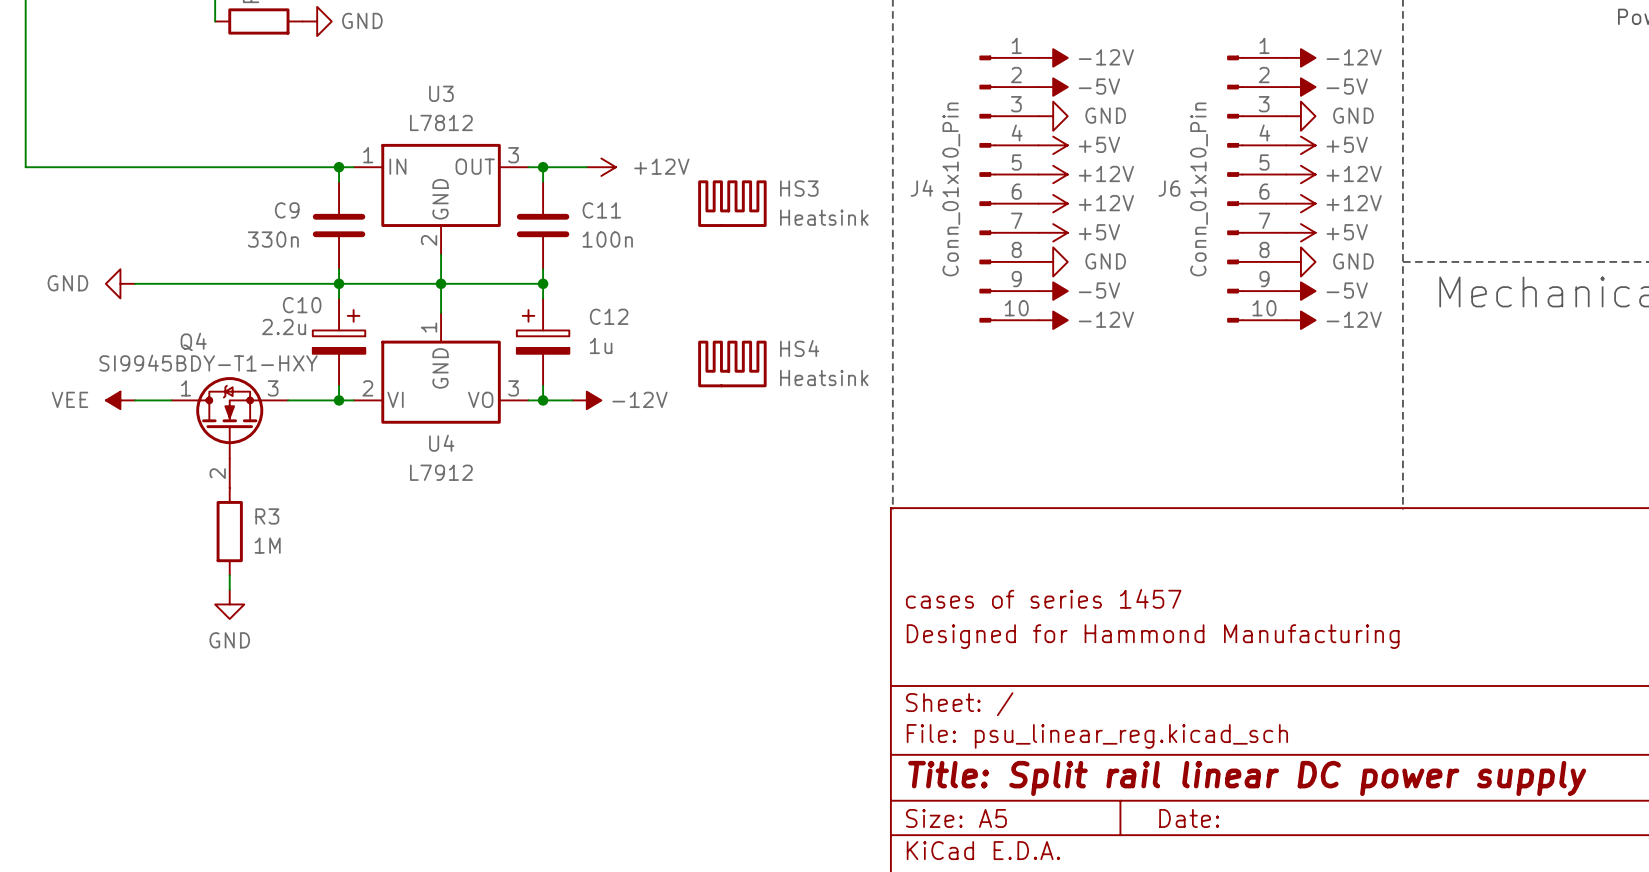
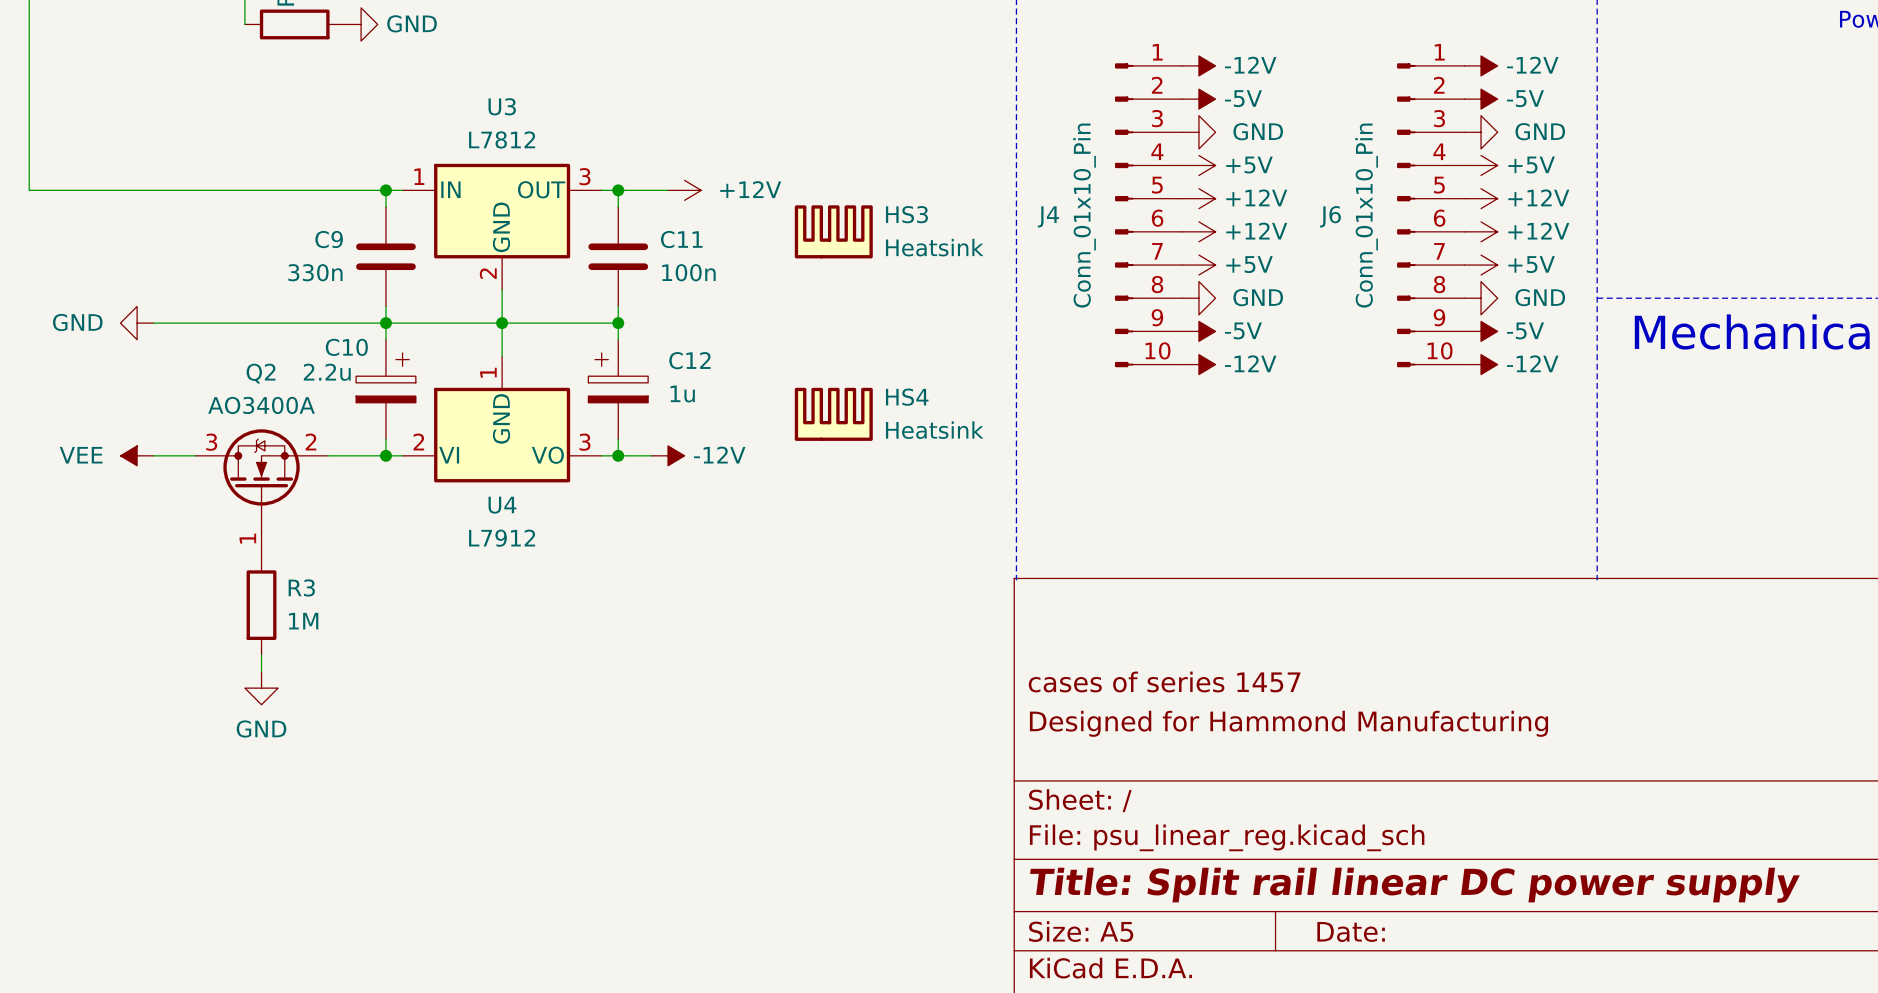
Q4 name: Q4 (193, 341) -> Q2 (261, 373)
Q4 value: SI9945BDY-T1-HXY (208, 363) -> AO3400A (261, 405)
Q4 pin number: 1 (186, 388) -> 3 (211, 442)
Q4 pin number: 3 (273, 388) -> 2 (311, 442)
Q4 pin number: 2 (217, 473) -> 1 (247, 538)

